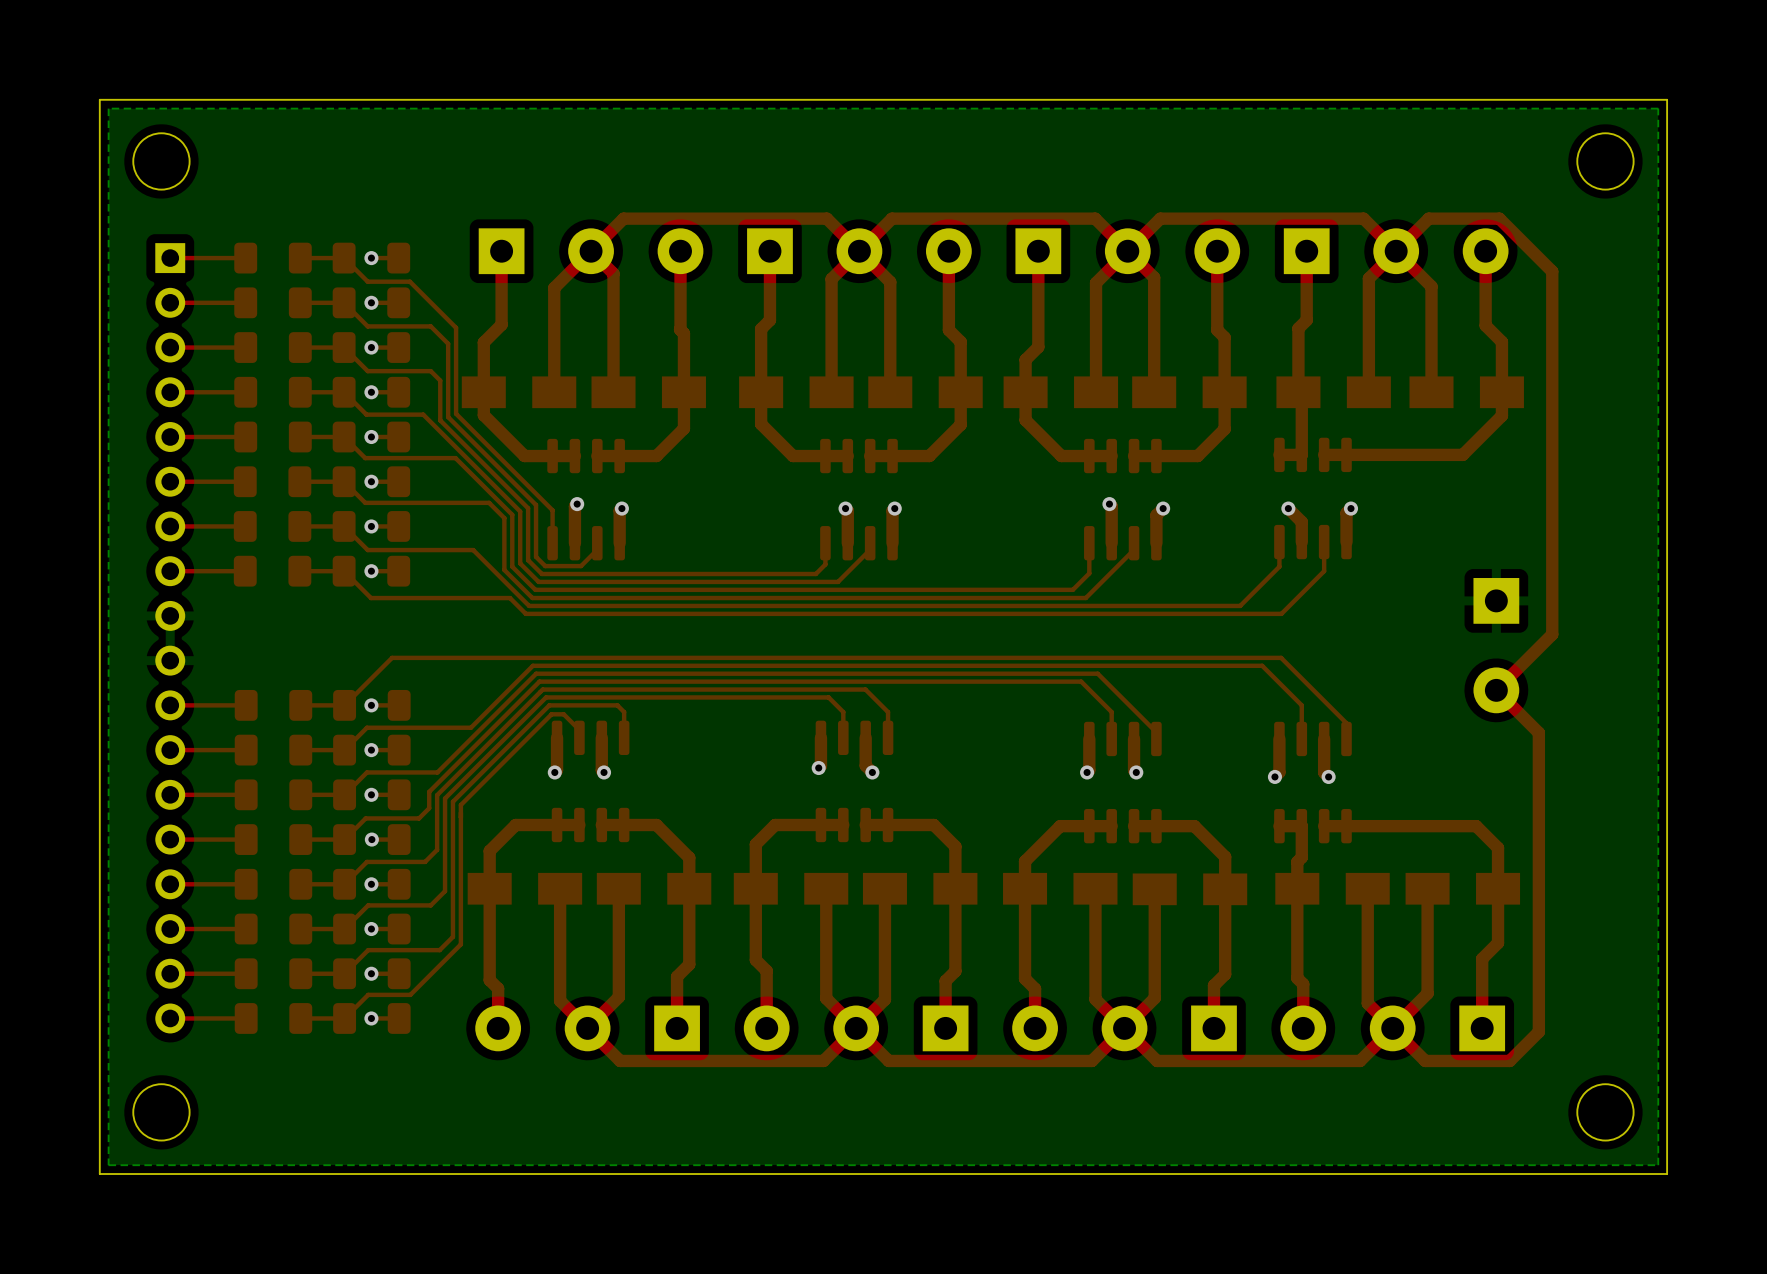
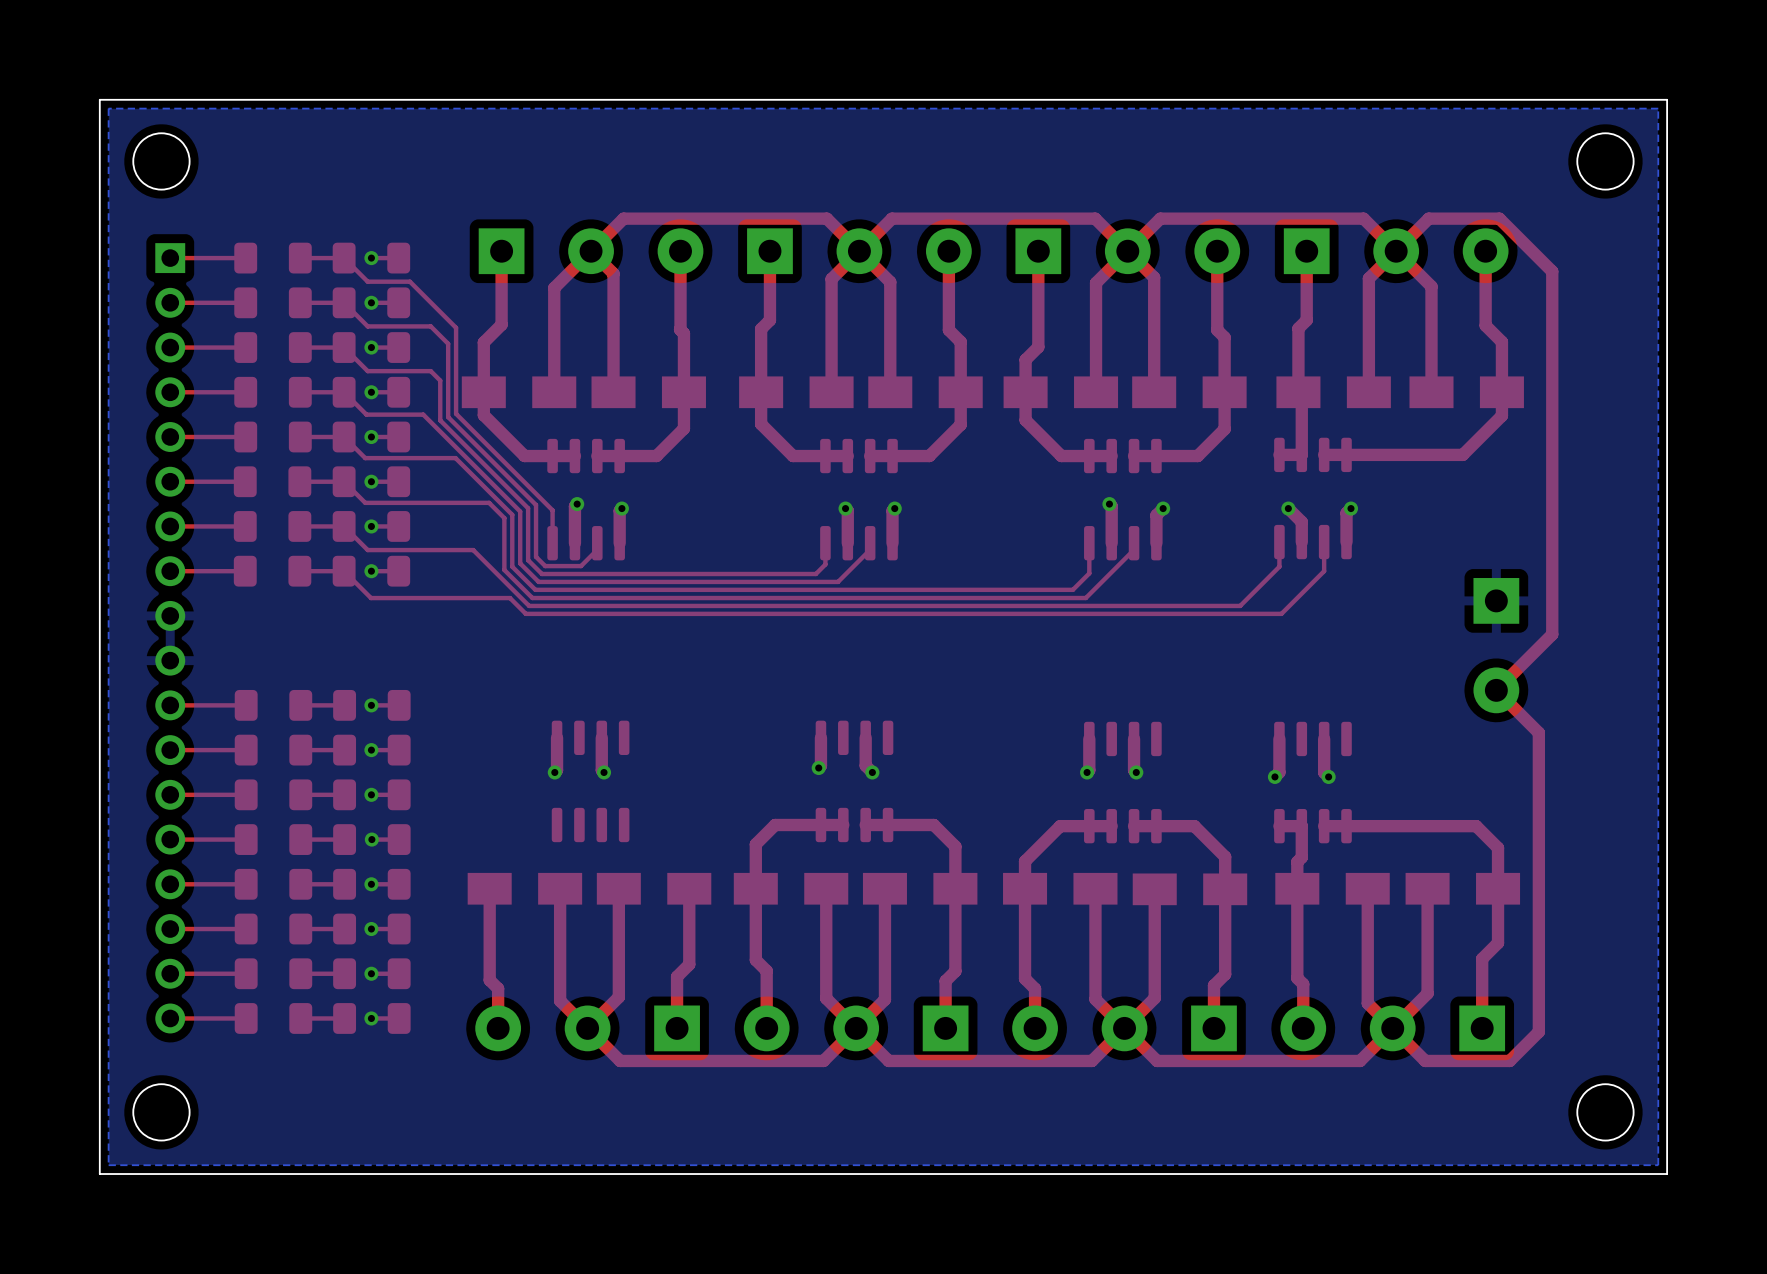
top track: (344, 705) (392, 657) (1281, 657) (1346, 723) (1346, 738) -> none
top track: (579, 737) (579, 729) (563, 714) (551, 714) (460, 805) (460, 944) (410, 994) (368, 994) (344, 1018) -> none
top track: (624, 737) (624, 712) (617, 705) (549, 705) (452, 801) (452, 936) (439, 950) (368, 950) (344, 973) -> none
top track: (843, 737) (843, 712) (828, 697) (546, 697) (445, 798) (445, 891) (430, 905) (368, 905) (344, 929) -> none
top track: (888, 737) (888, 712) (865, 689) (542, 689) (437, 795) (437, 849) (425, 861) (366, 861) (344, 884) -> none
top track: (1111, 738) (1111, 712) (1081, 681) (539, 681) (429, 791) (429, 808) (419, 818) (365, 818) (344, 839) -> none
top track: (1156, 738) (1156, 732) (1097, 673) (536, 673) (437, 772) (366, 772) (344, 794) -> none
top track: (1301, 738) (1301, 705) (1262, 665) (532, 665) (470, 727) (366, 727) (344, 750) -> none
top track: (579, 825) (515, 825) (489, 851) (489, 888) -> none
top track: (601, 825) (656, 825) (689, 857) (689, 888) -> none

